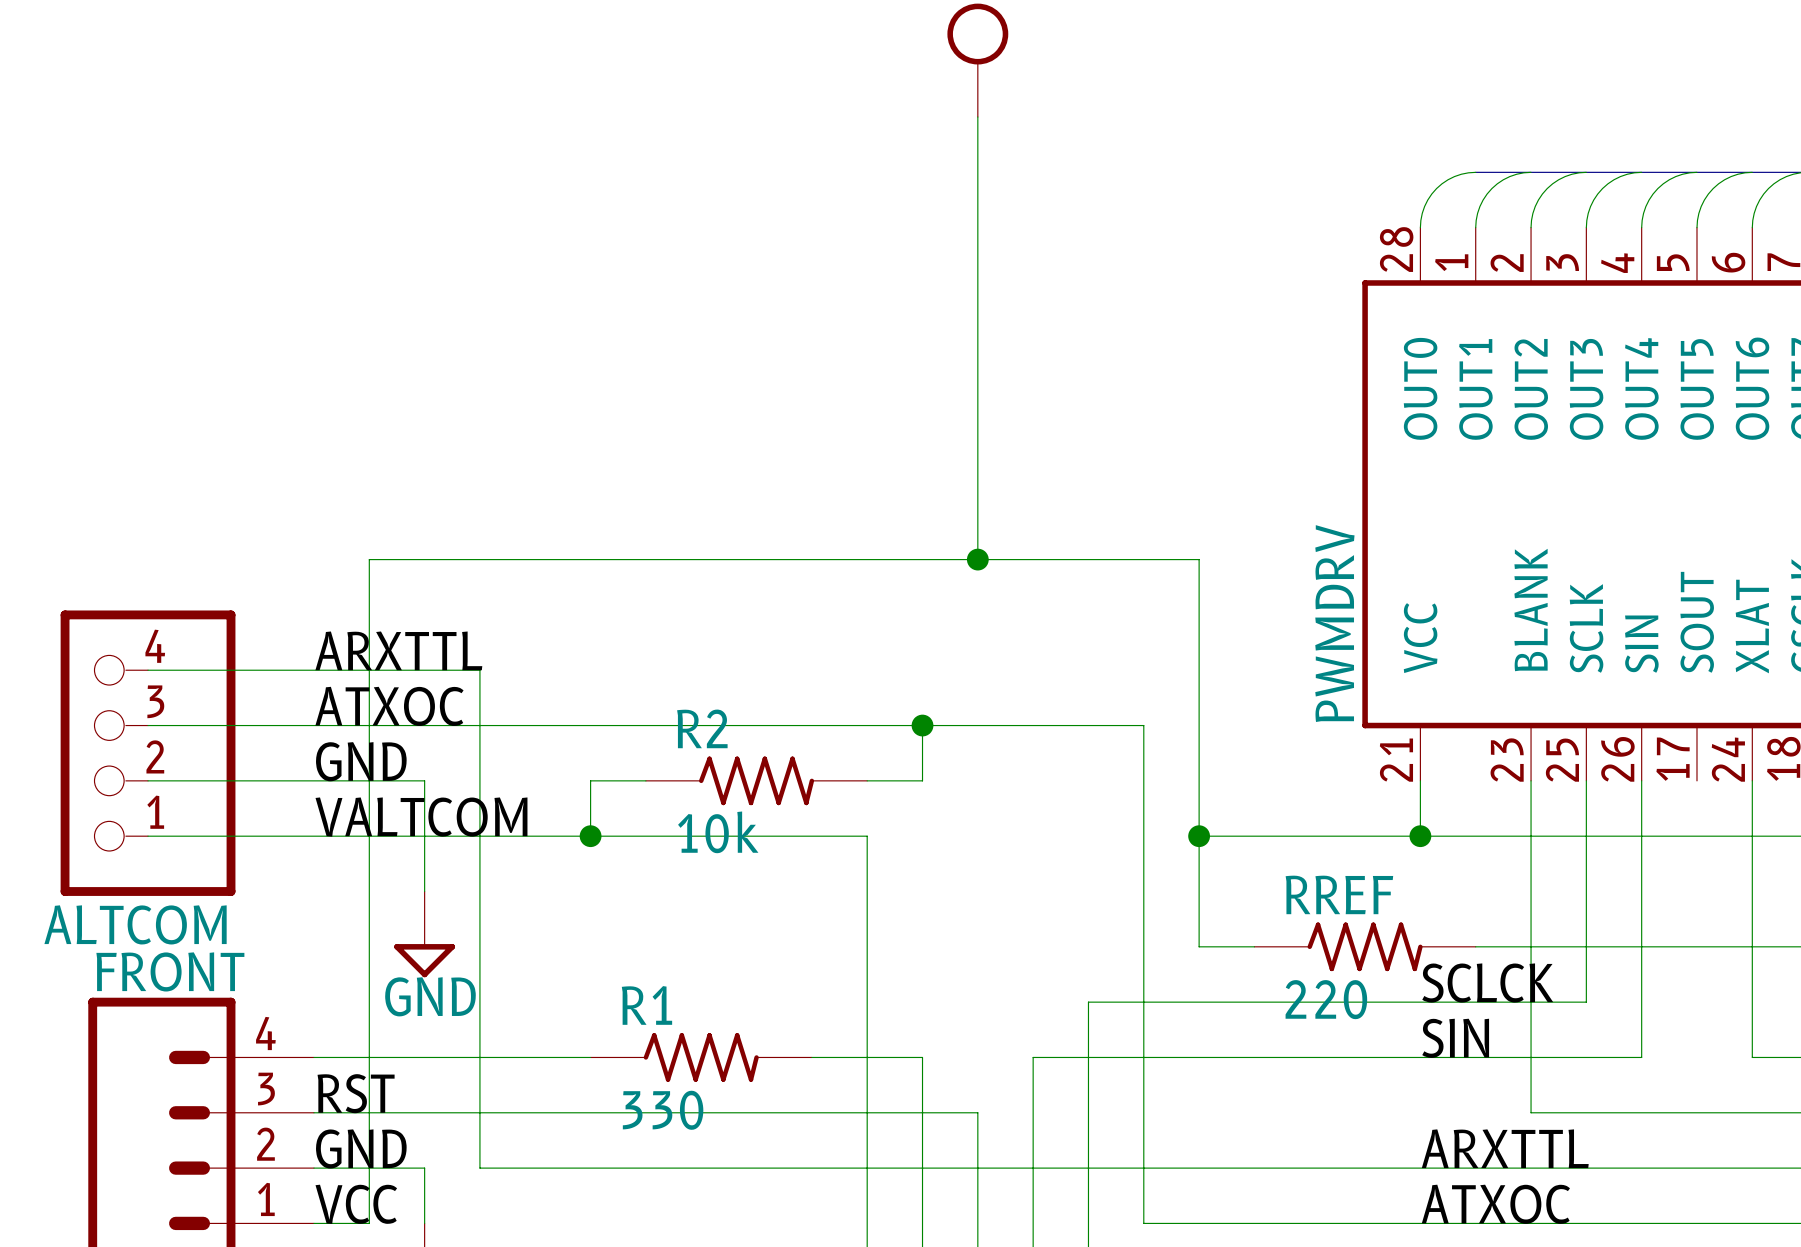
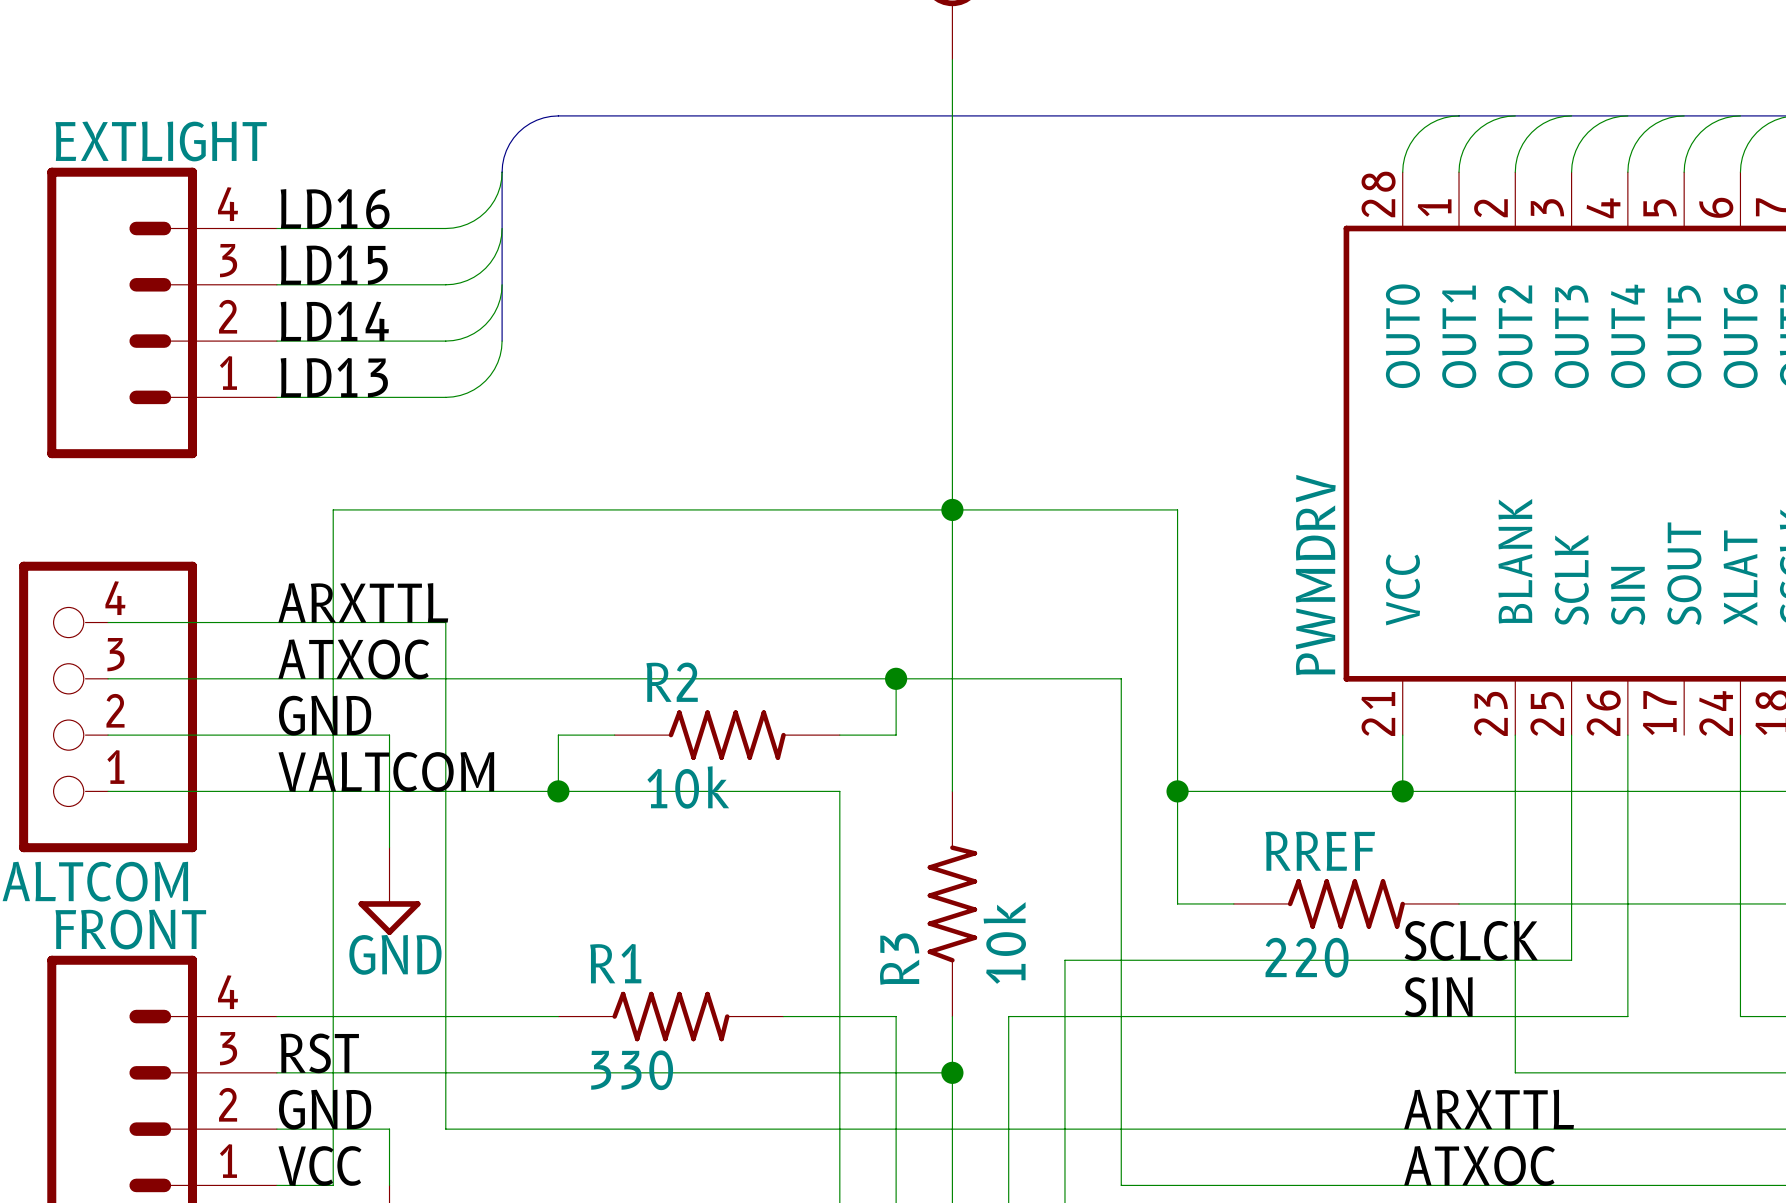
bus: none -> (1459, 115) (558, 115) (543, 117) (530, 123) (518, 132) (506, 150) (502, 164) (502, 341)
wire: none -> (502, 172) (500, 186) (490, 206) (473, 220) (460, 226) (445, 228) (276, 228)
label: none -> LD16 (335, 209)
wire: none -> (502, 228) (497, 250) (490, 262) (480, 273) (460, 282) (445, 284) (276, 284)
label: none -> LD15 (334, 265)
wire: none -> (502, 284) (500, 299) (490, 319) (480, 329) (460, 339) (445, 341) (276, 341)
EXTLIGHT: none -> (162, 312)
label: none -> LD14 (334, 321)
wire: none -> (502, 341) (497, 362) (490, 375) (480, 385) (460, 395) (445, 397) (276, 397)
label: none -> LD13 (334, 377)
wire: none -> (952, 509) (952, 791)
R3: none -> 10k (952, 903)
wire: none -> (952, 1016) (952, 1072)
junction: none -> (952, 1072)

